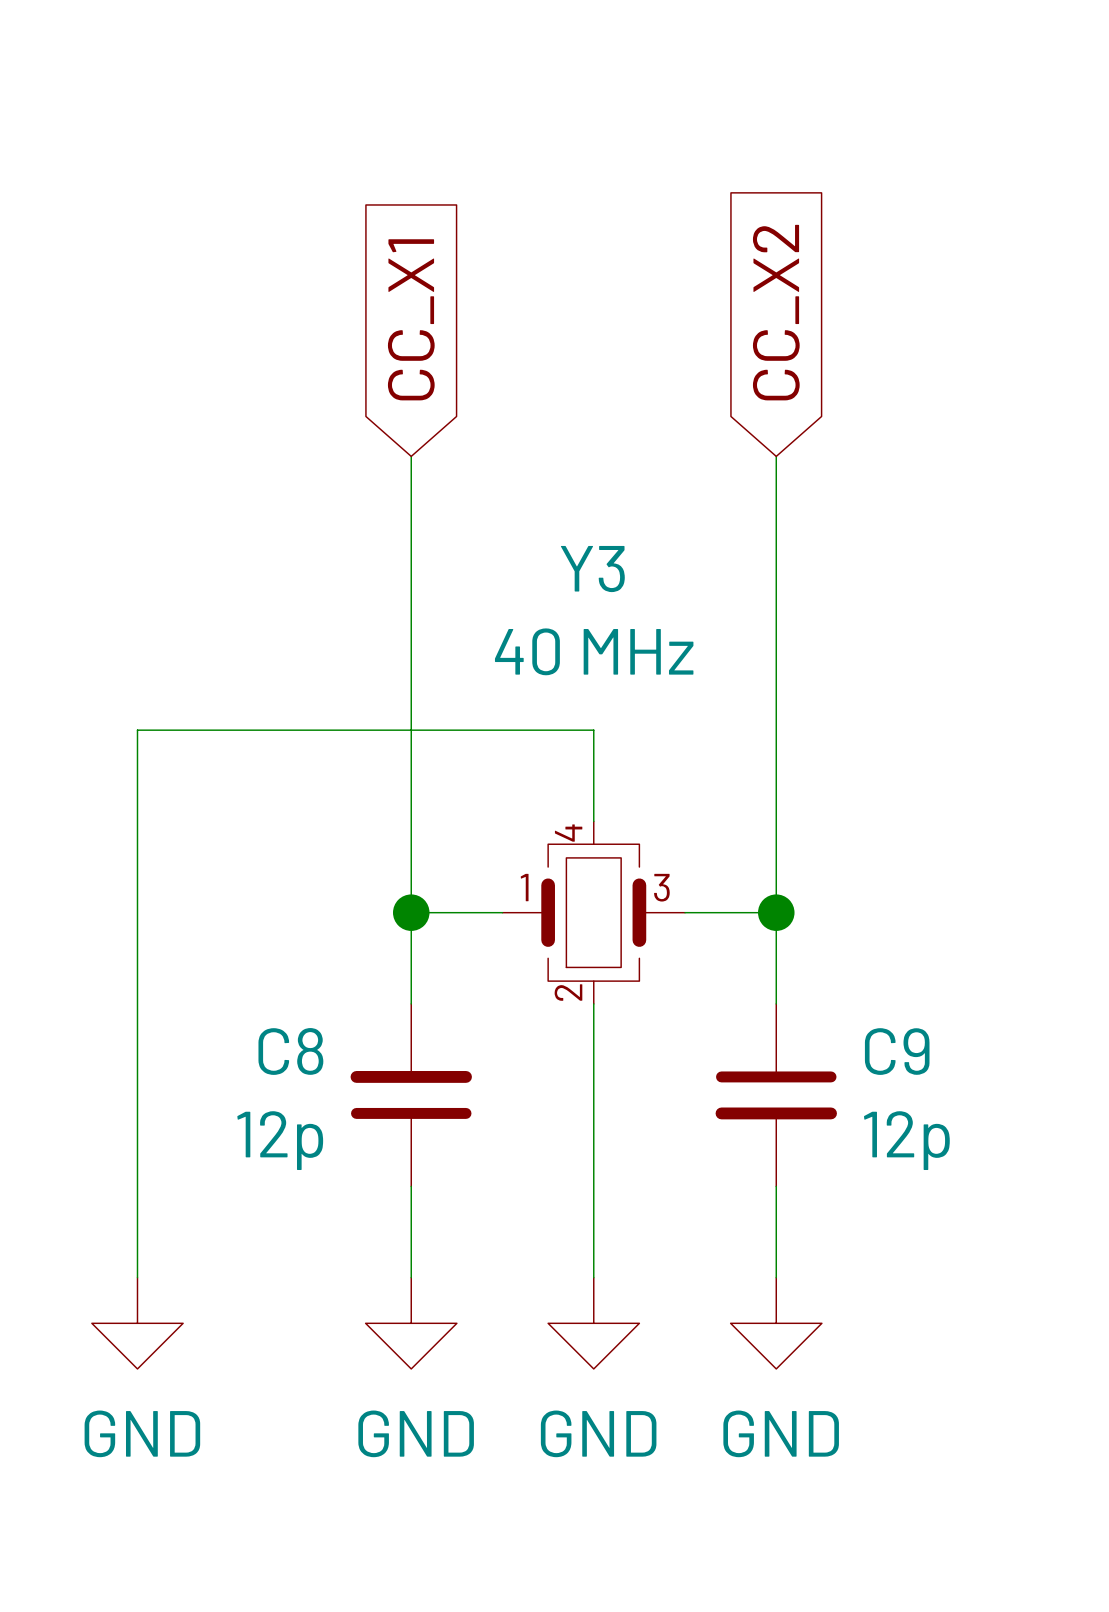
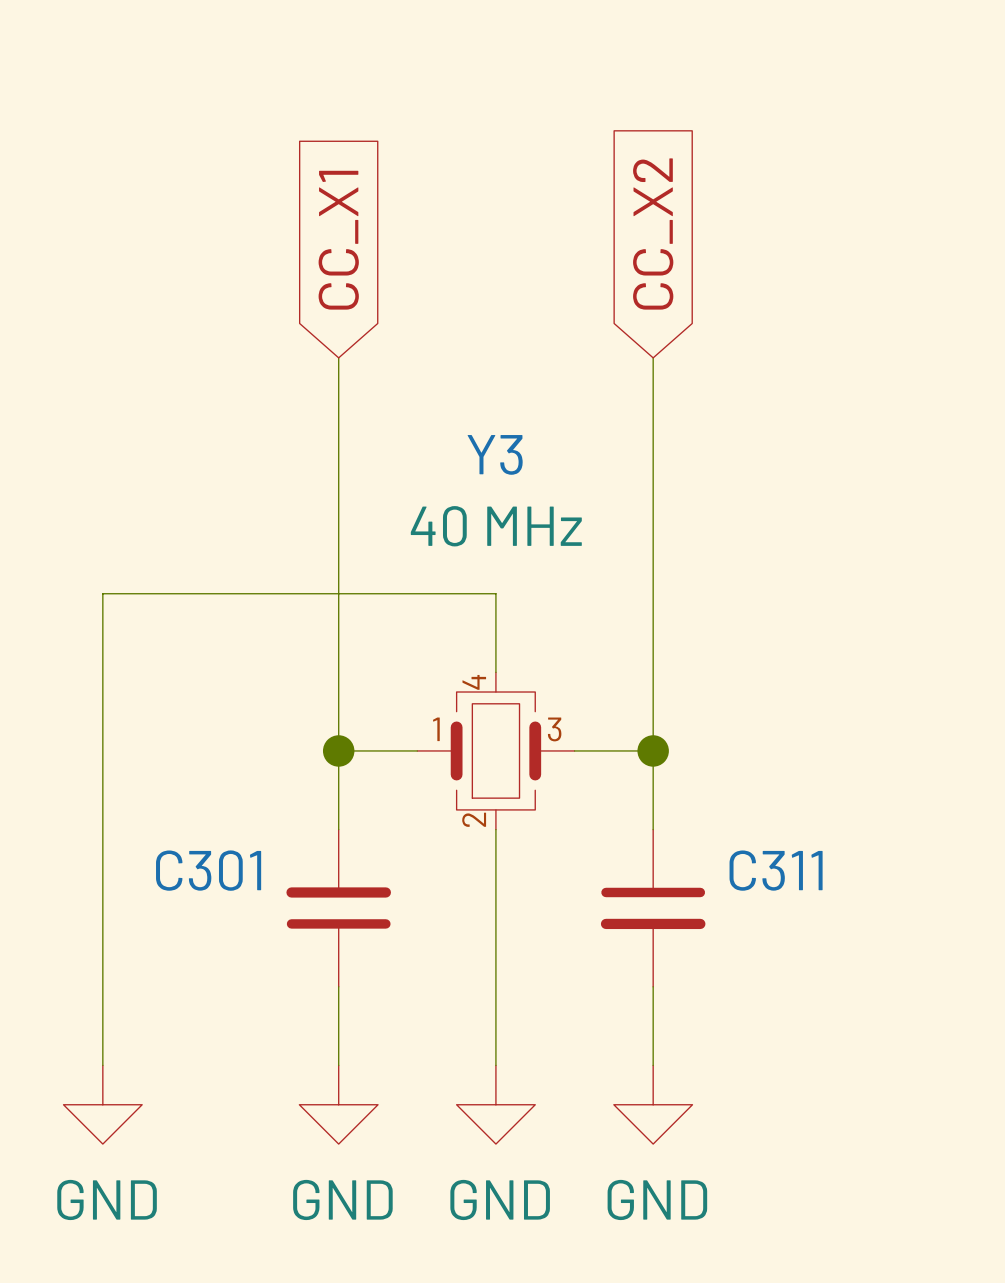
C8 name: C8 (290, 1051) -> C301 (208, 870)
C9 name: C9 (897, 1051) -> C311 (776, 870)
C8 value: 12p (280, 1140) -> none
C9 value: 12p (906, 1140) -> none

